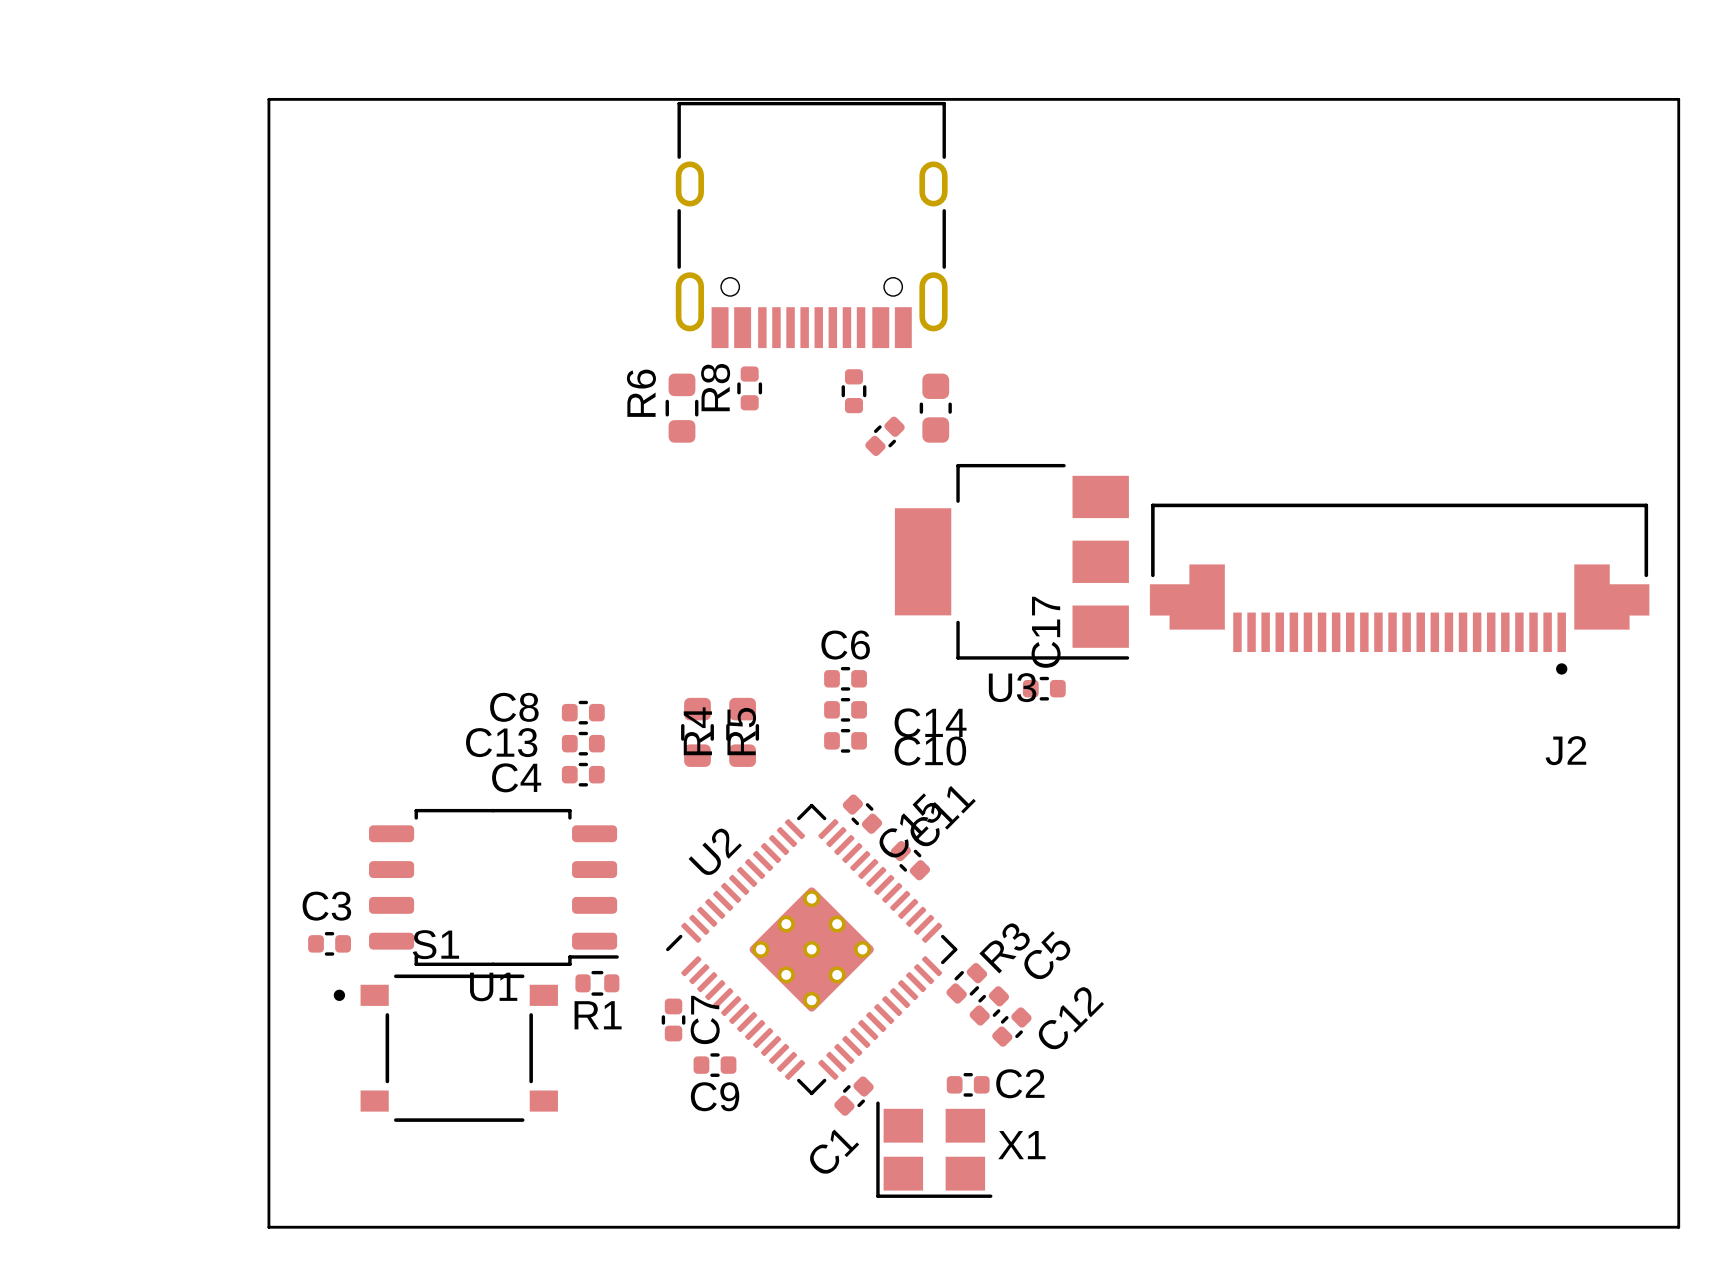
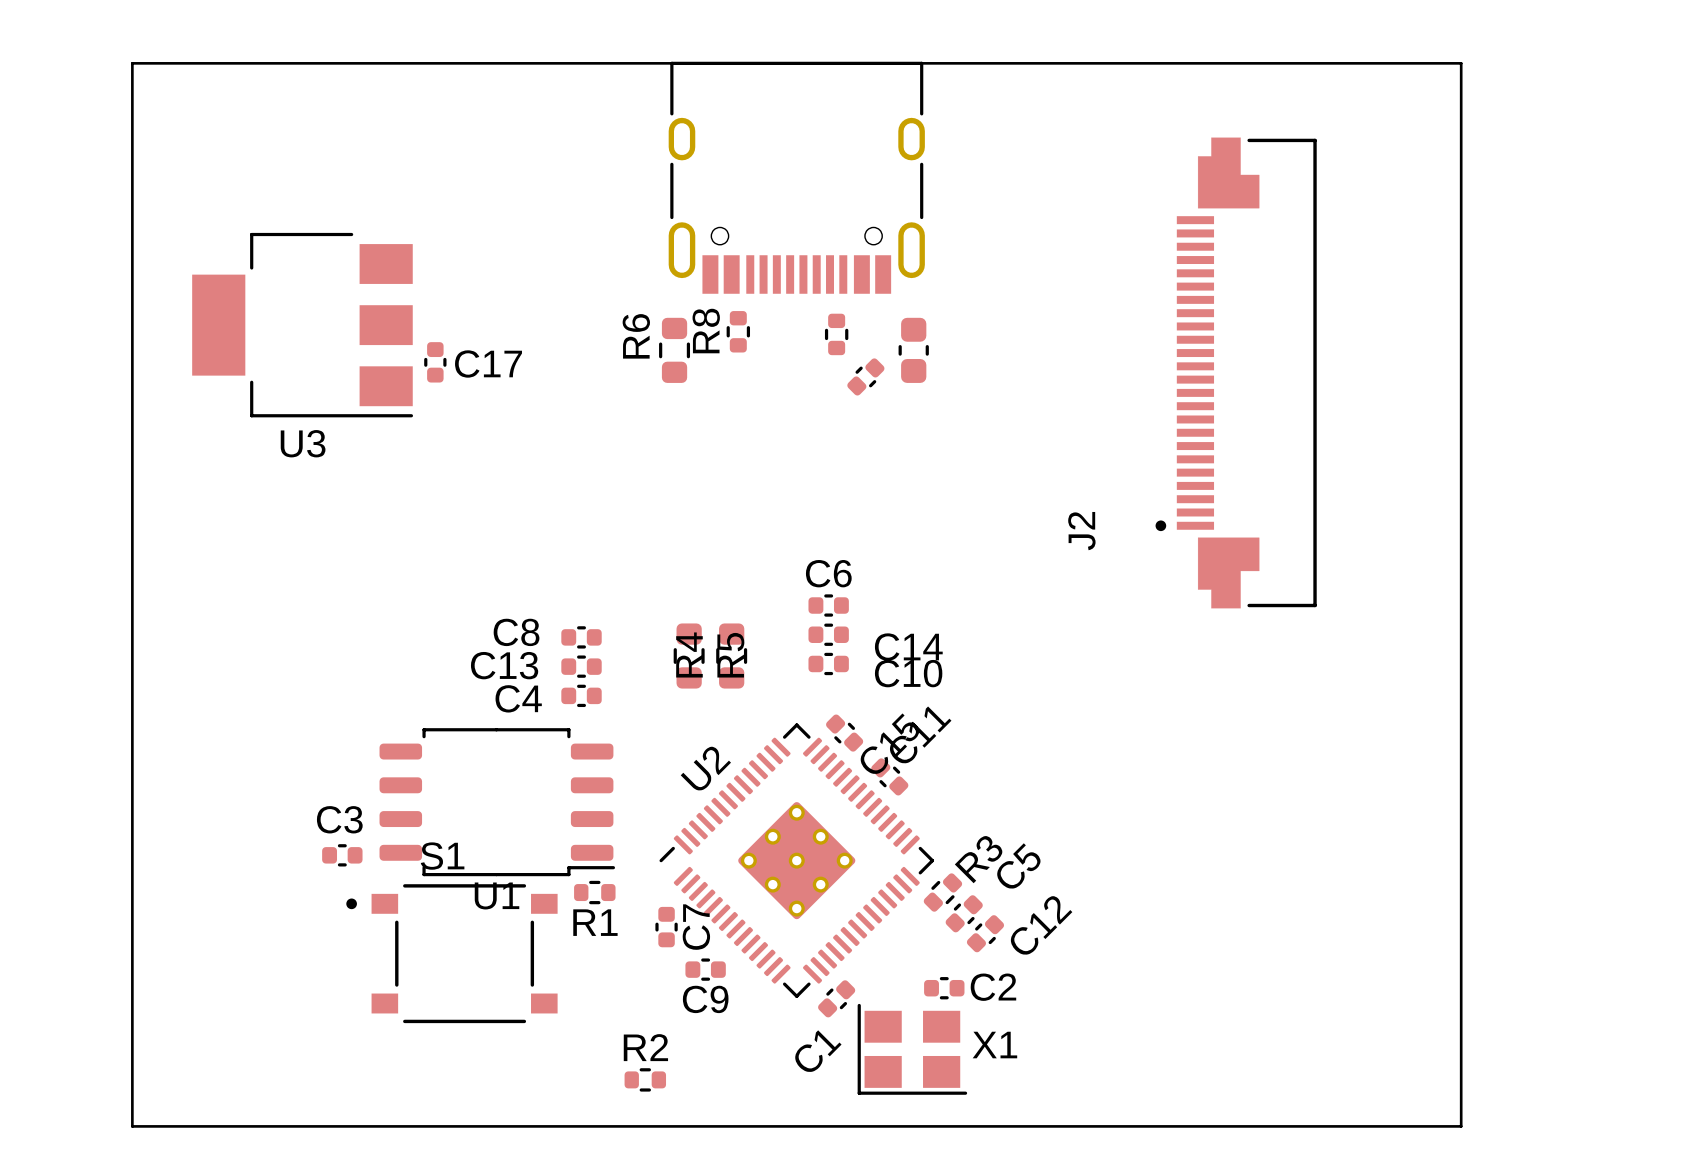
board edge: (268, 99) (1678, 99) (1678, 1227) (268, 1227) (268, 99) -> (132, 63) (132, 1126) (1461, 1126) (1461, 63) (132, 63)
U3 position: (1012, 561) -> (302, 325)
J2 rotation: 0° (1399, 589) -> 90° clockwise (1236, 372)
C17 rotation: 0° (1044, 688) -> 90° clockwise (435, 362)
C17 position: (1044, 688) -> (435, 362)
R2: none -> (645, 1079)

